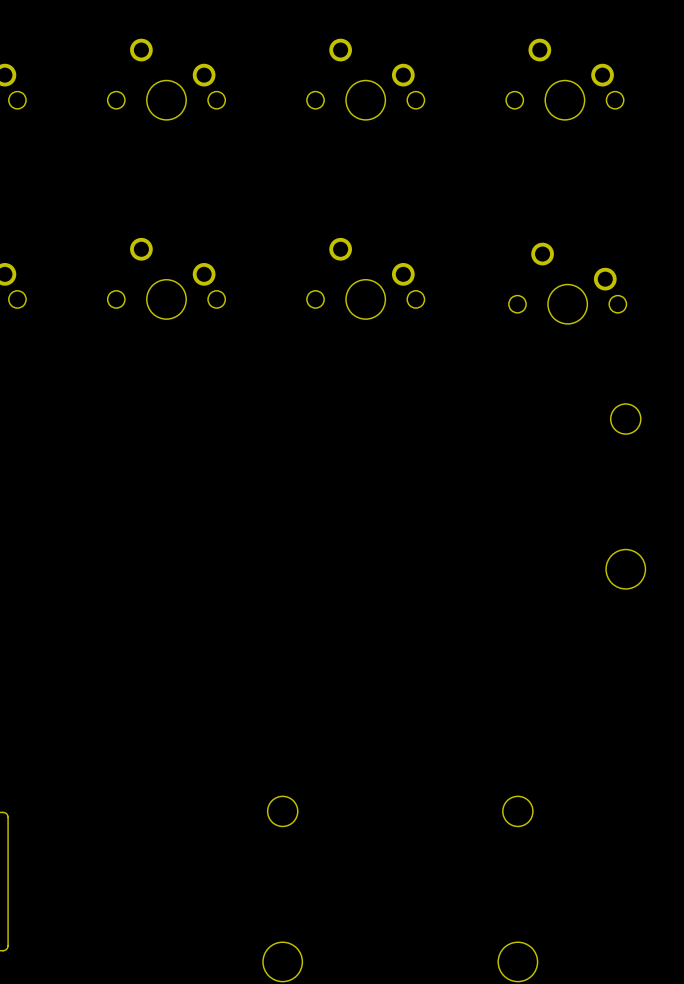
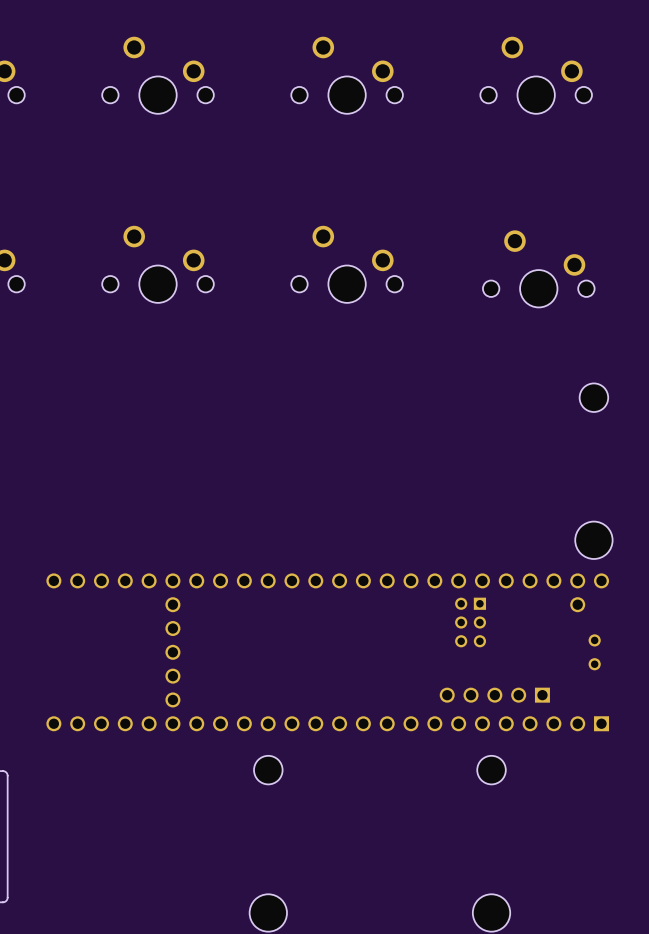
part: none -> (327, 652)

